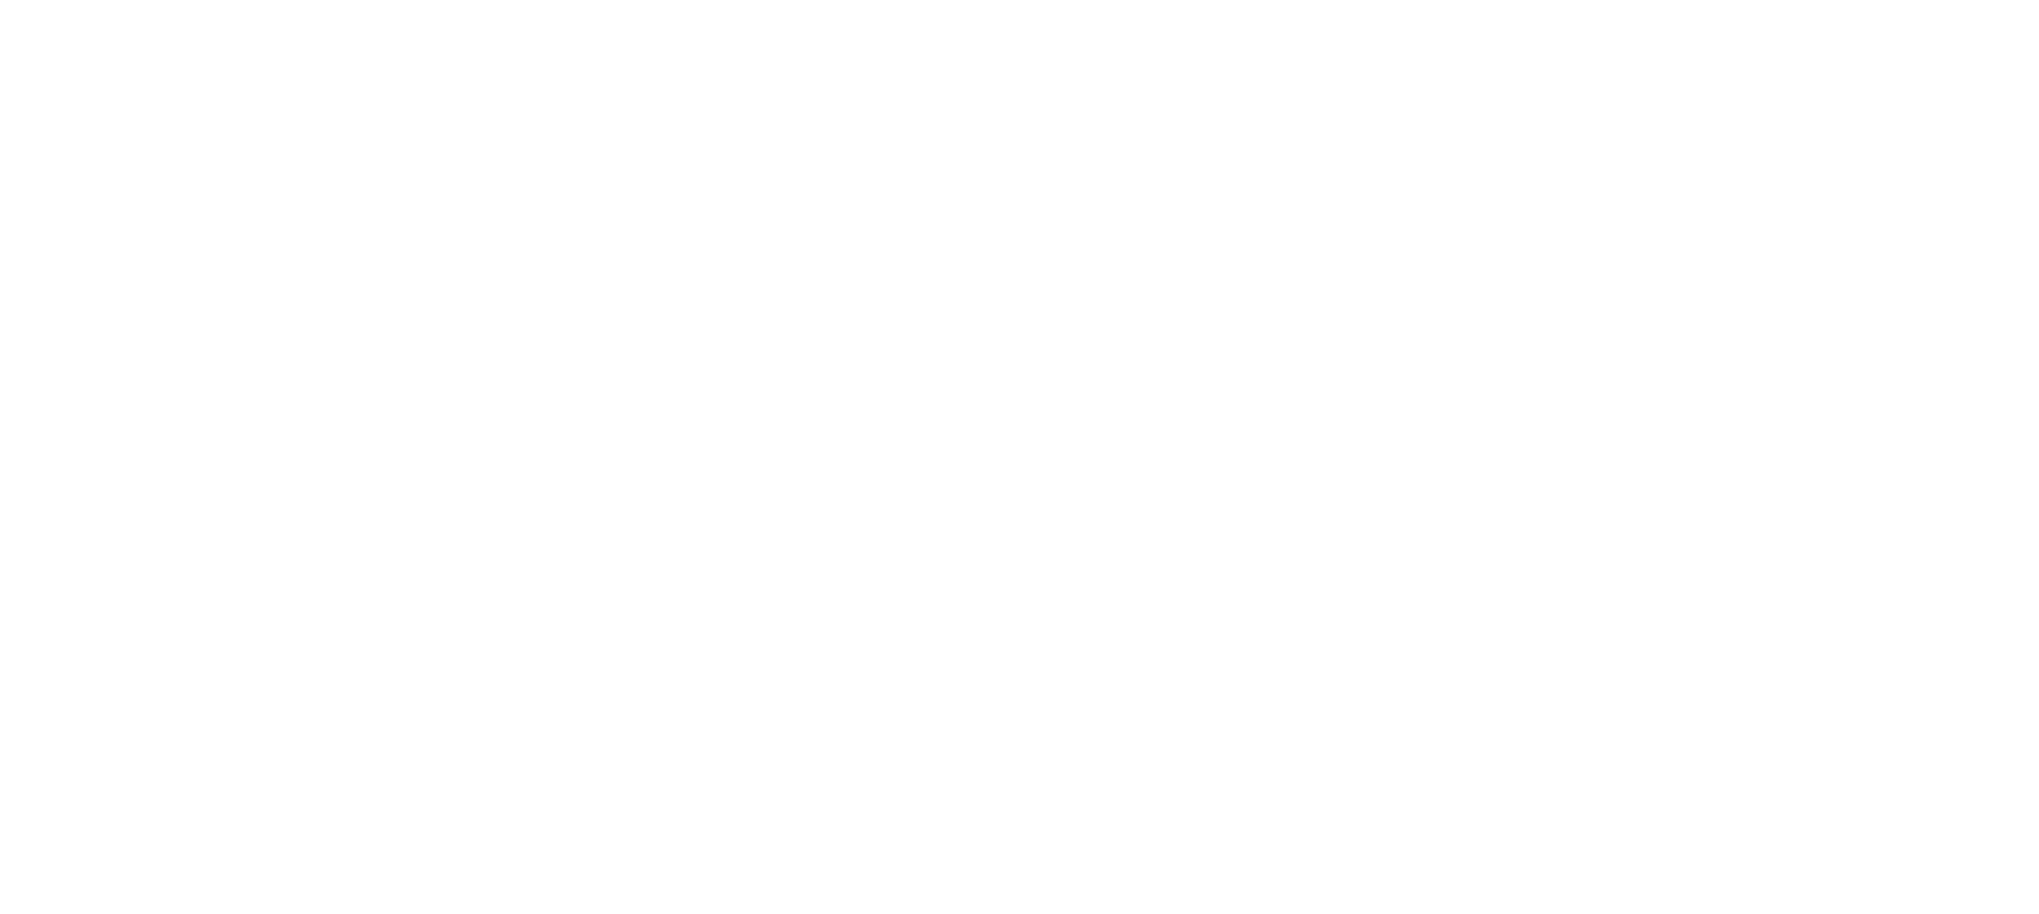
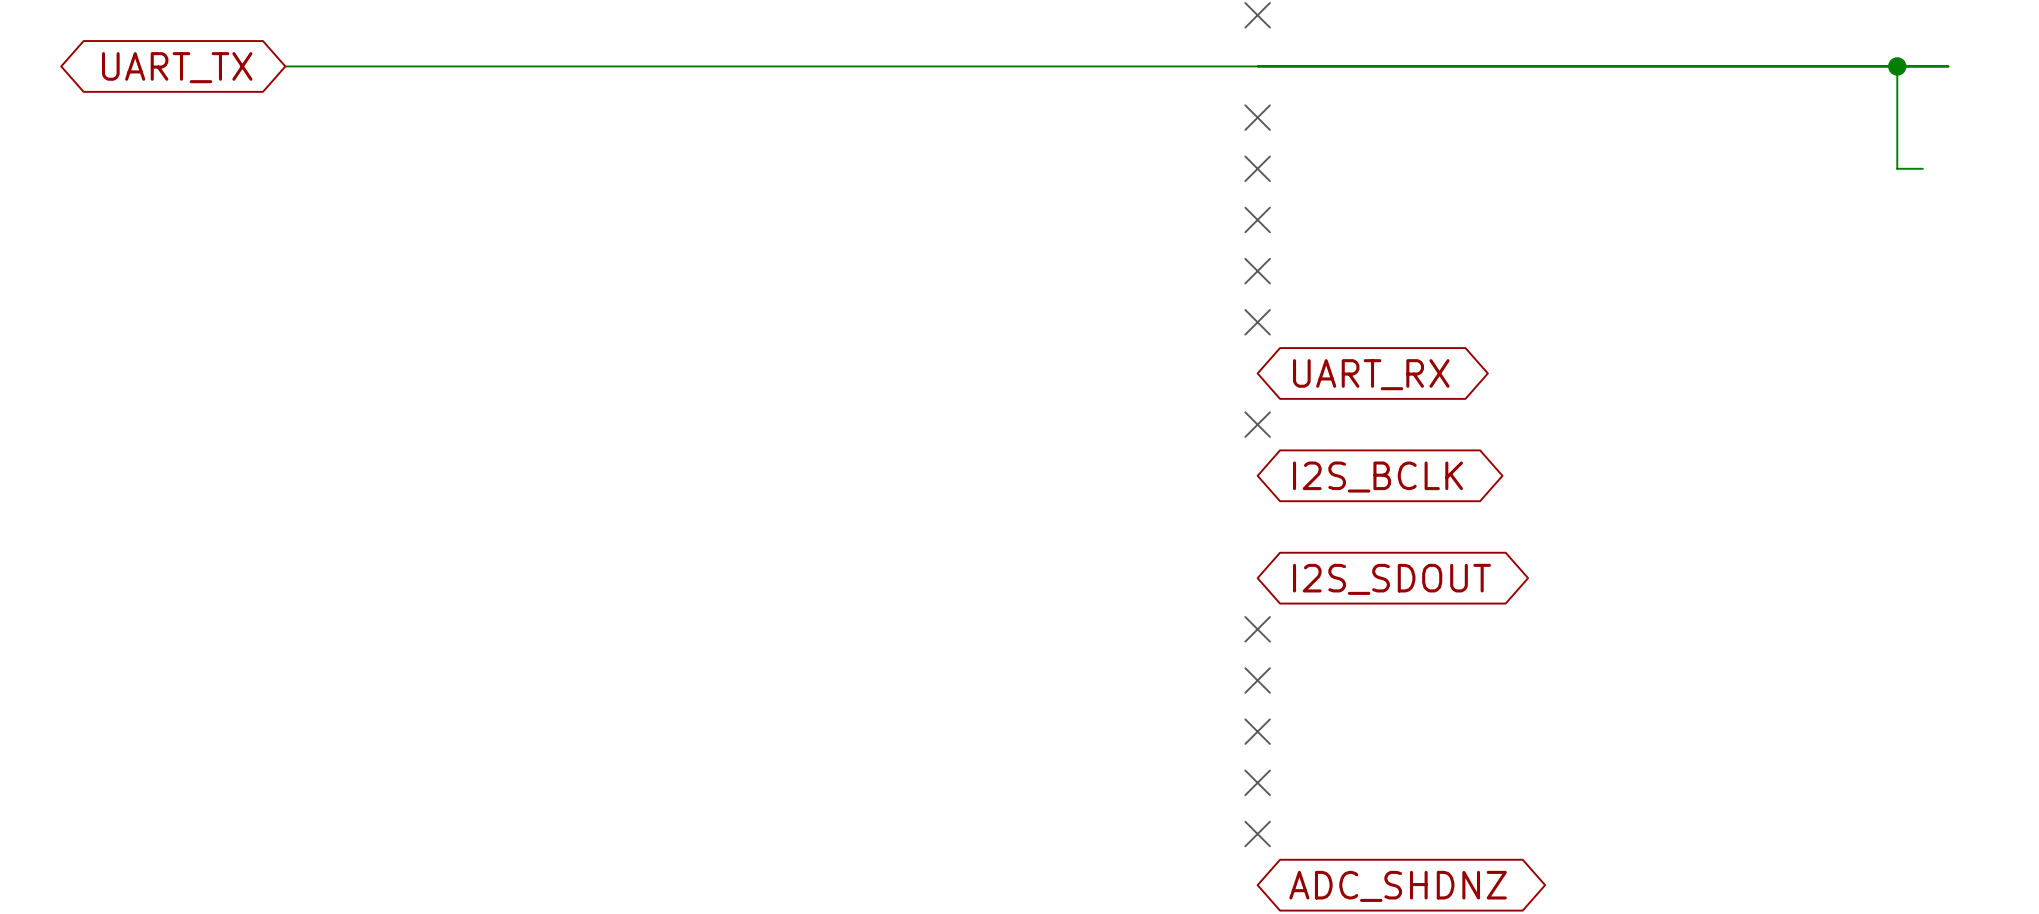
no-connect mark: none -> (1257, 15)
wire: none -> (285, 66) (1948, 66)
wire: none -> (1897, 66) (1897, 168) (1922, 168)
junction: none -> (1897, 66)
global label: none -> UART_TX (177, 67)
no-connect mark: none -> (1257, 117)
no-connect mark: none -> (1257, 168)
no-connect mark: none -> (1257, 219)
no-connect mark: none -> (1257, 271)
no-connect mark: none -> (1257, 322)
global label: none -> UART_RX (1371, 374)
no-connect mark: none -> (1257, 424)
global label: none -> I2S_BCLK (1377, 477)
global label: none -> I2S_SDOUT (1392, 579)
no-connect mark: none -> (1257, 629)
no-connect mark: none -> (1257, 680)
no-connect mark: none -> (1257, 731)
no-connect mark: none -> (1257, 782)
no-connect mark: none -> (1257, 834)
global label: none -> ADC_SHDNZ (1398, 886)

